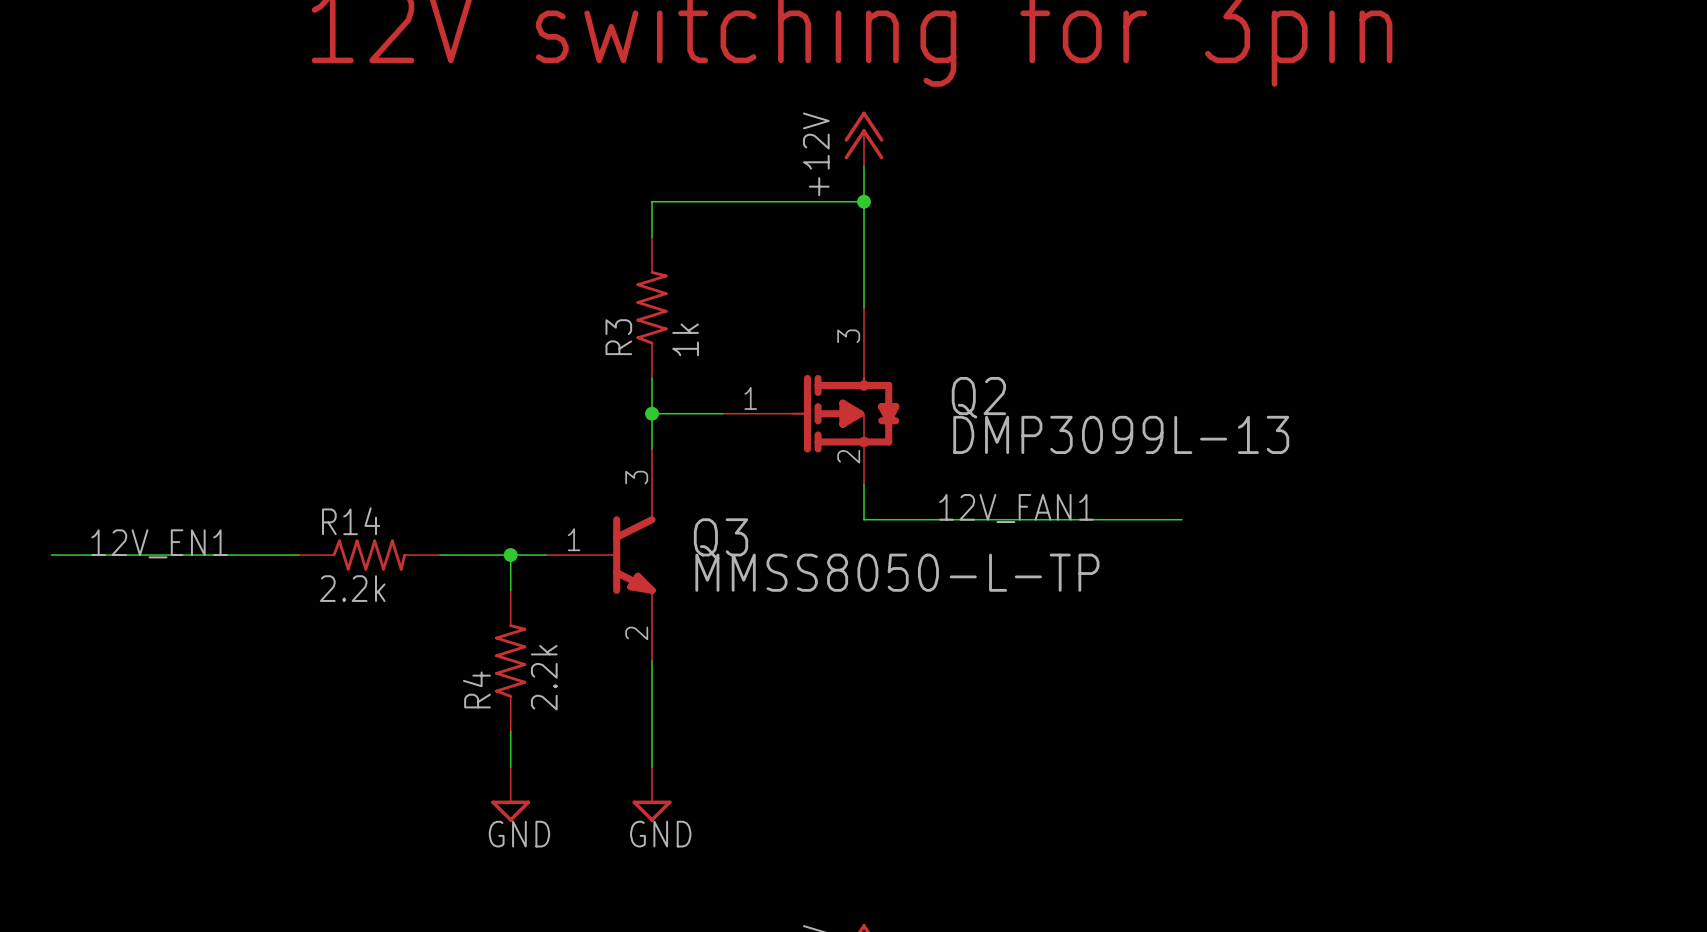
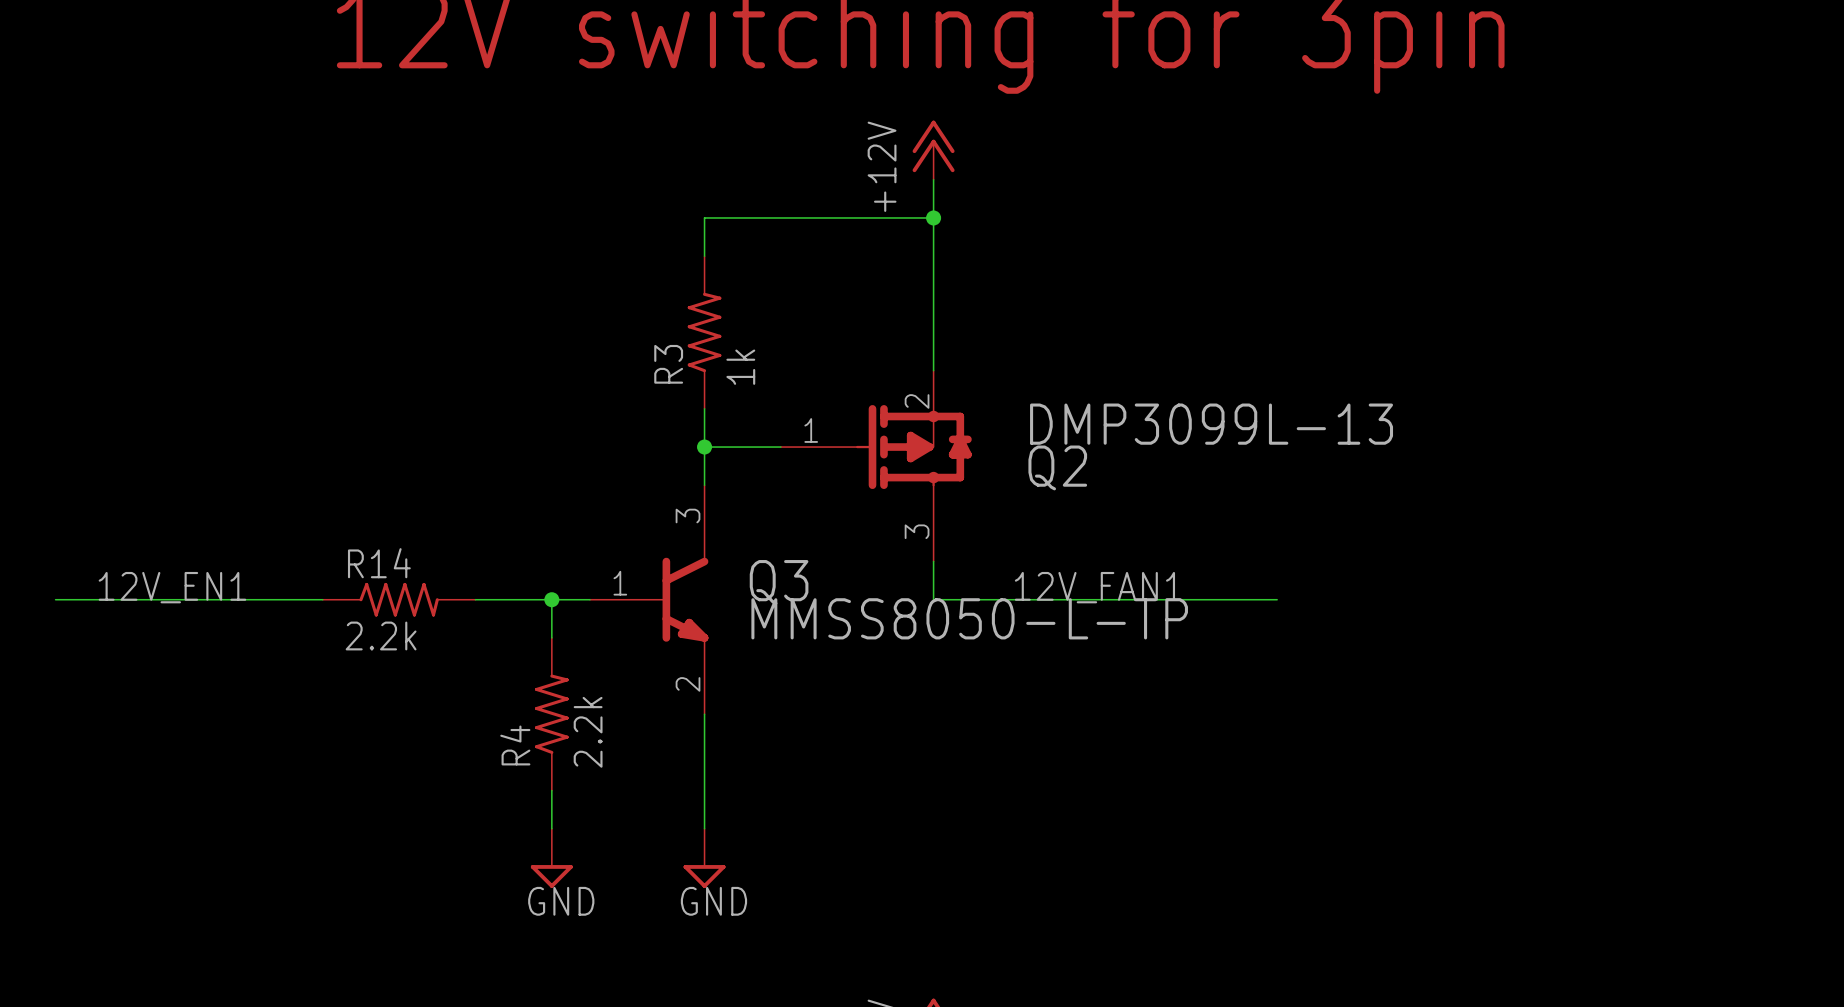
Q2 symbol: [722, 307, 900, 485] -> [780, 370, 972, 562]
wire: (864, 484) (864, 519) (1181, 519) -> (933, 561) (933, 599) (1277, 599)
label position: 12V_FAN1 (1016, 508) -> 12V_FAN1 (1098, 587)

